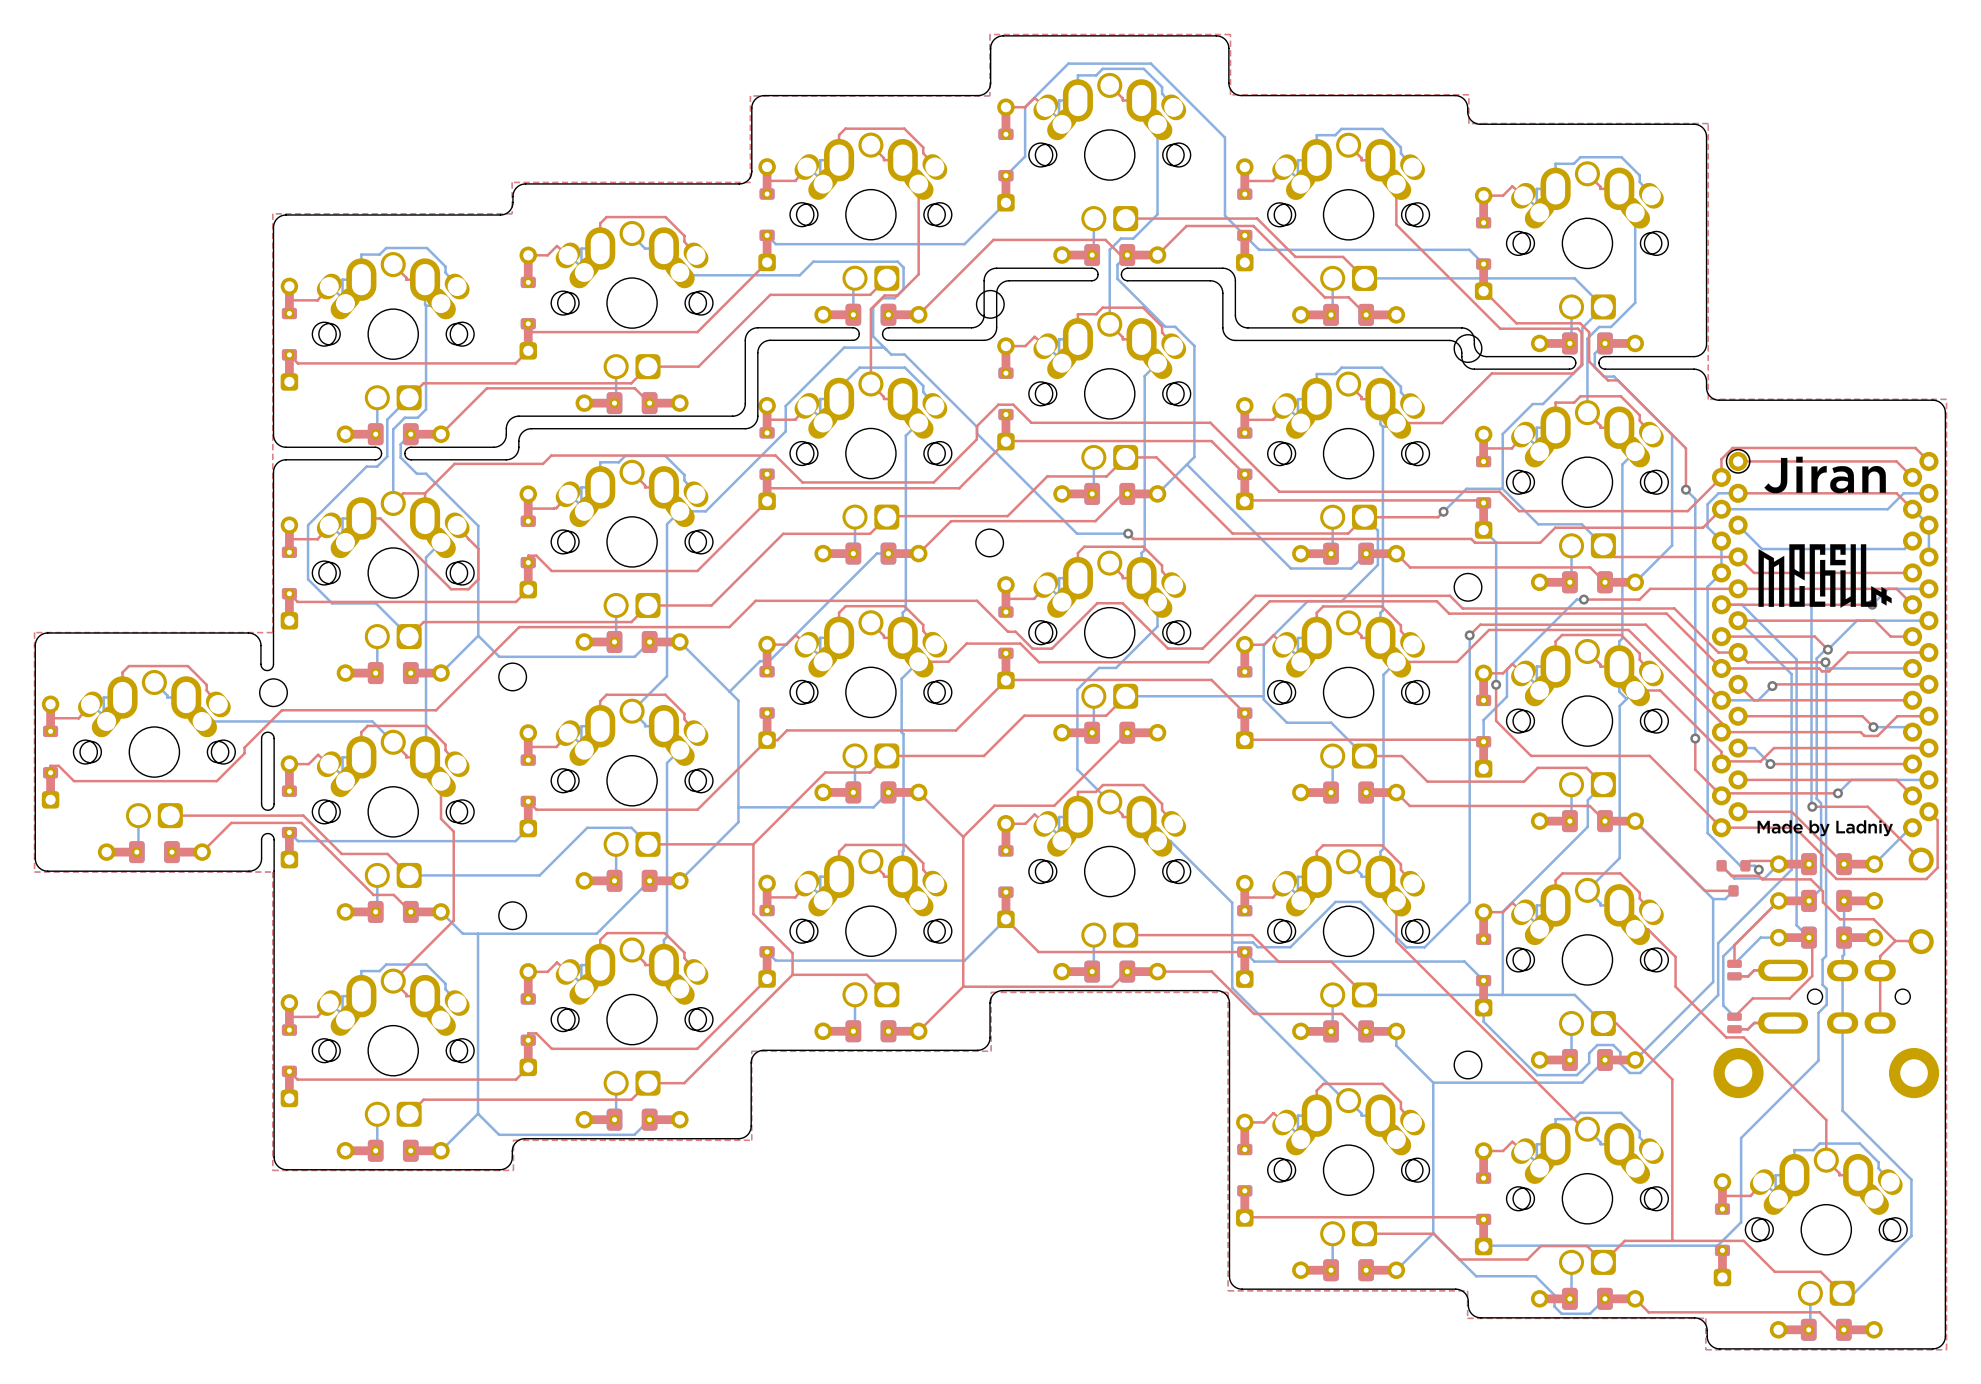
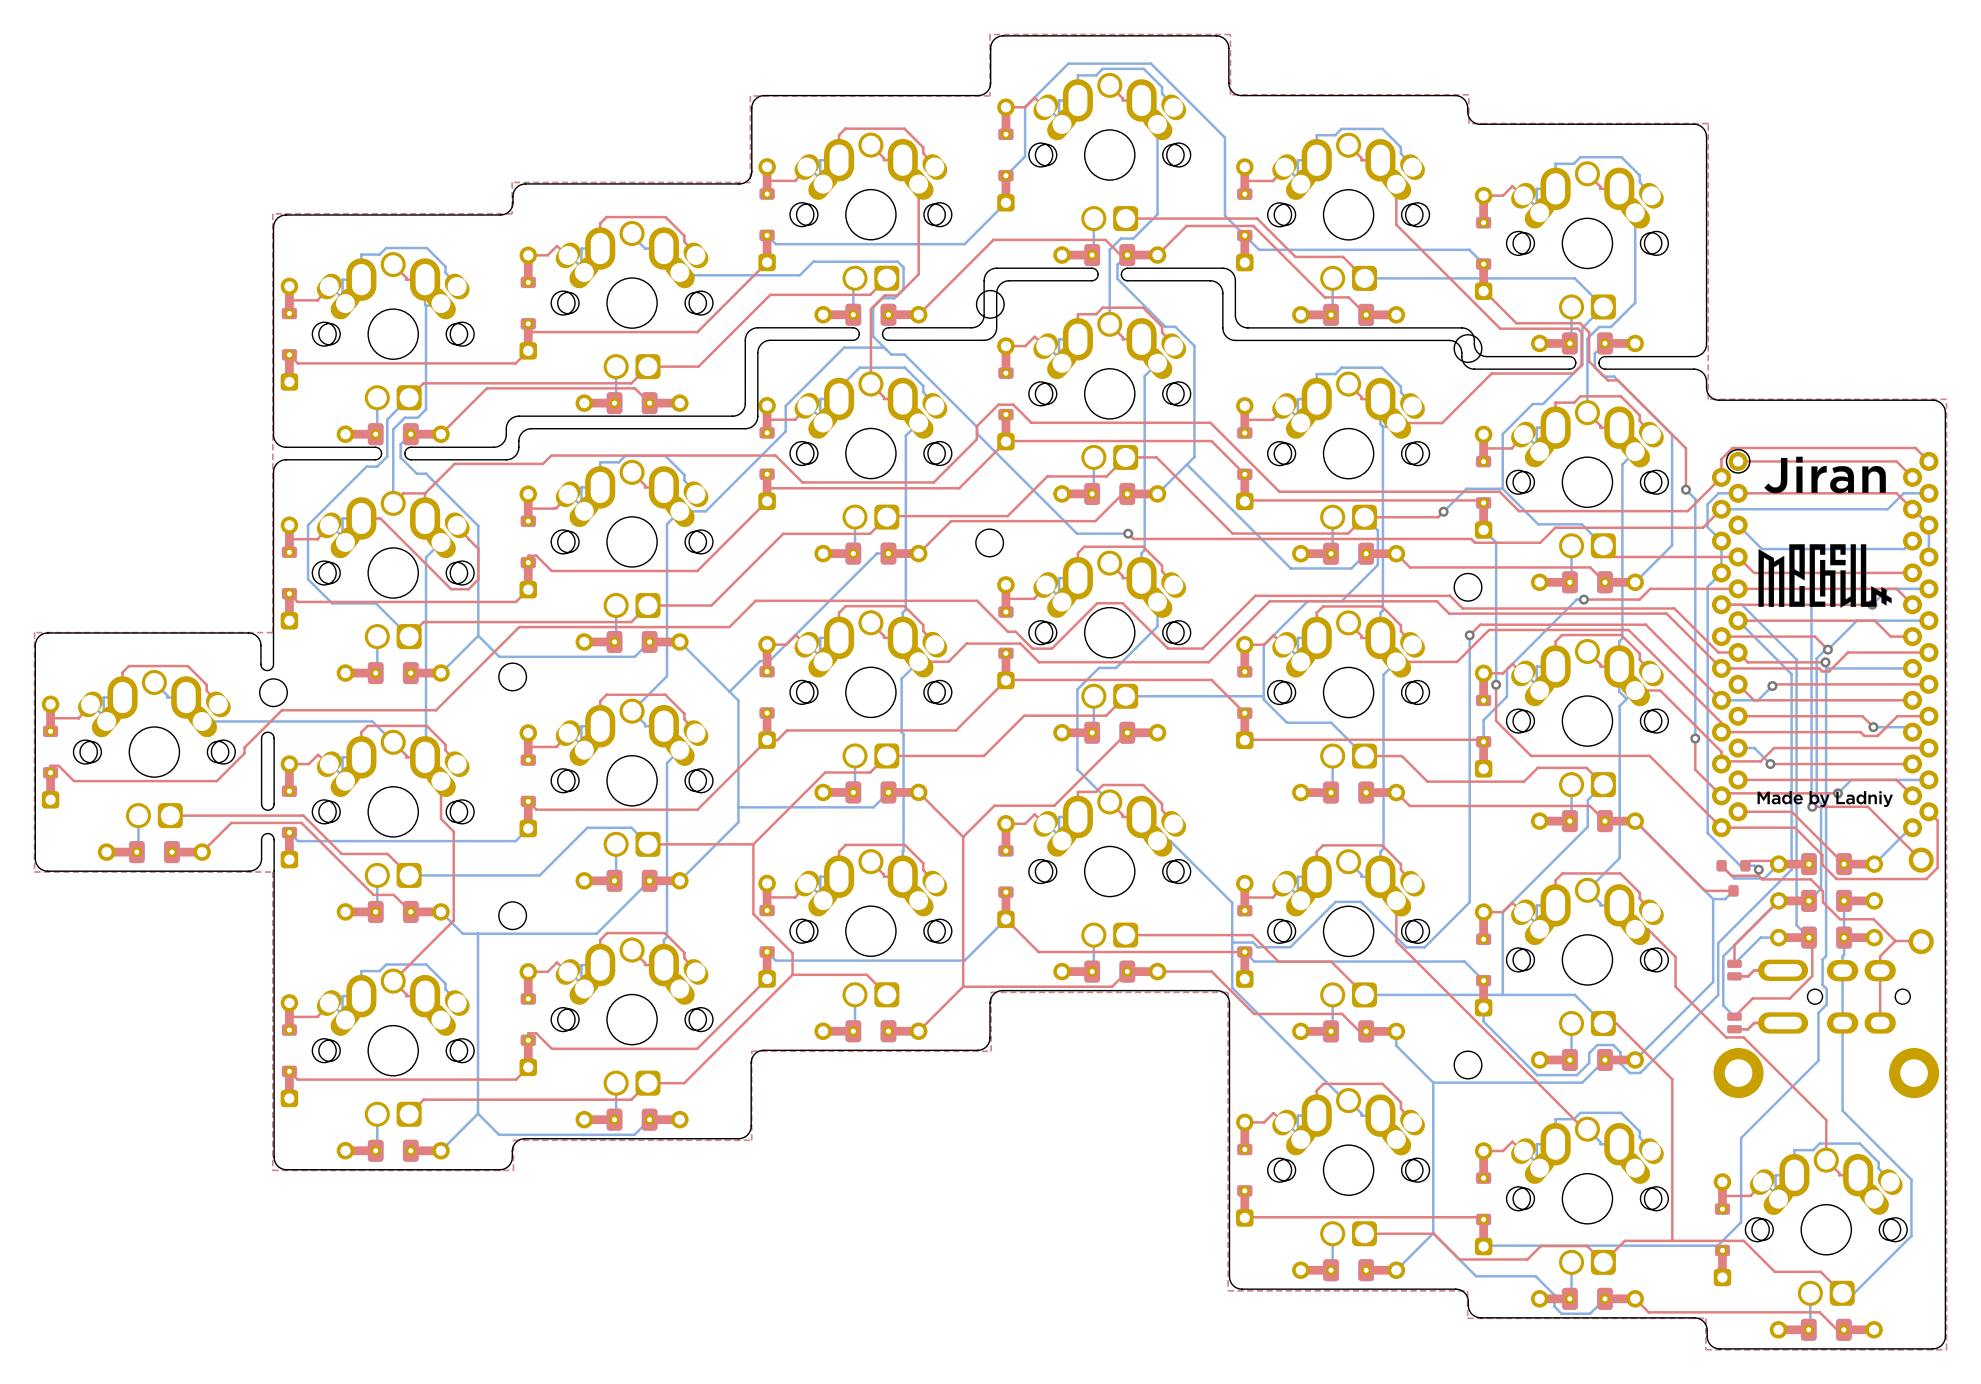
drawing: [1757, 456, 1893, 837] -> none
drawing: none -> [1757, 456, 1893, 807]

